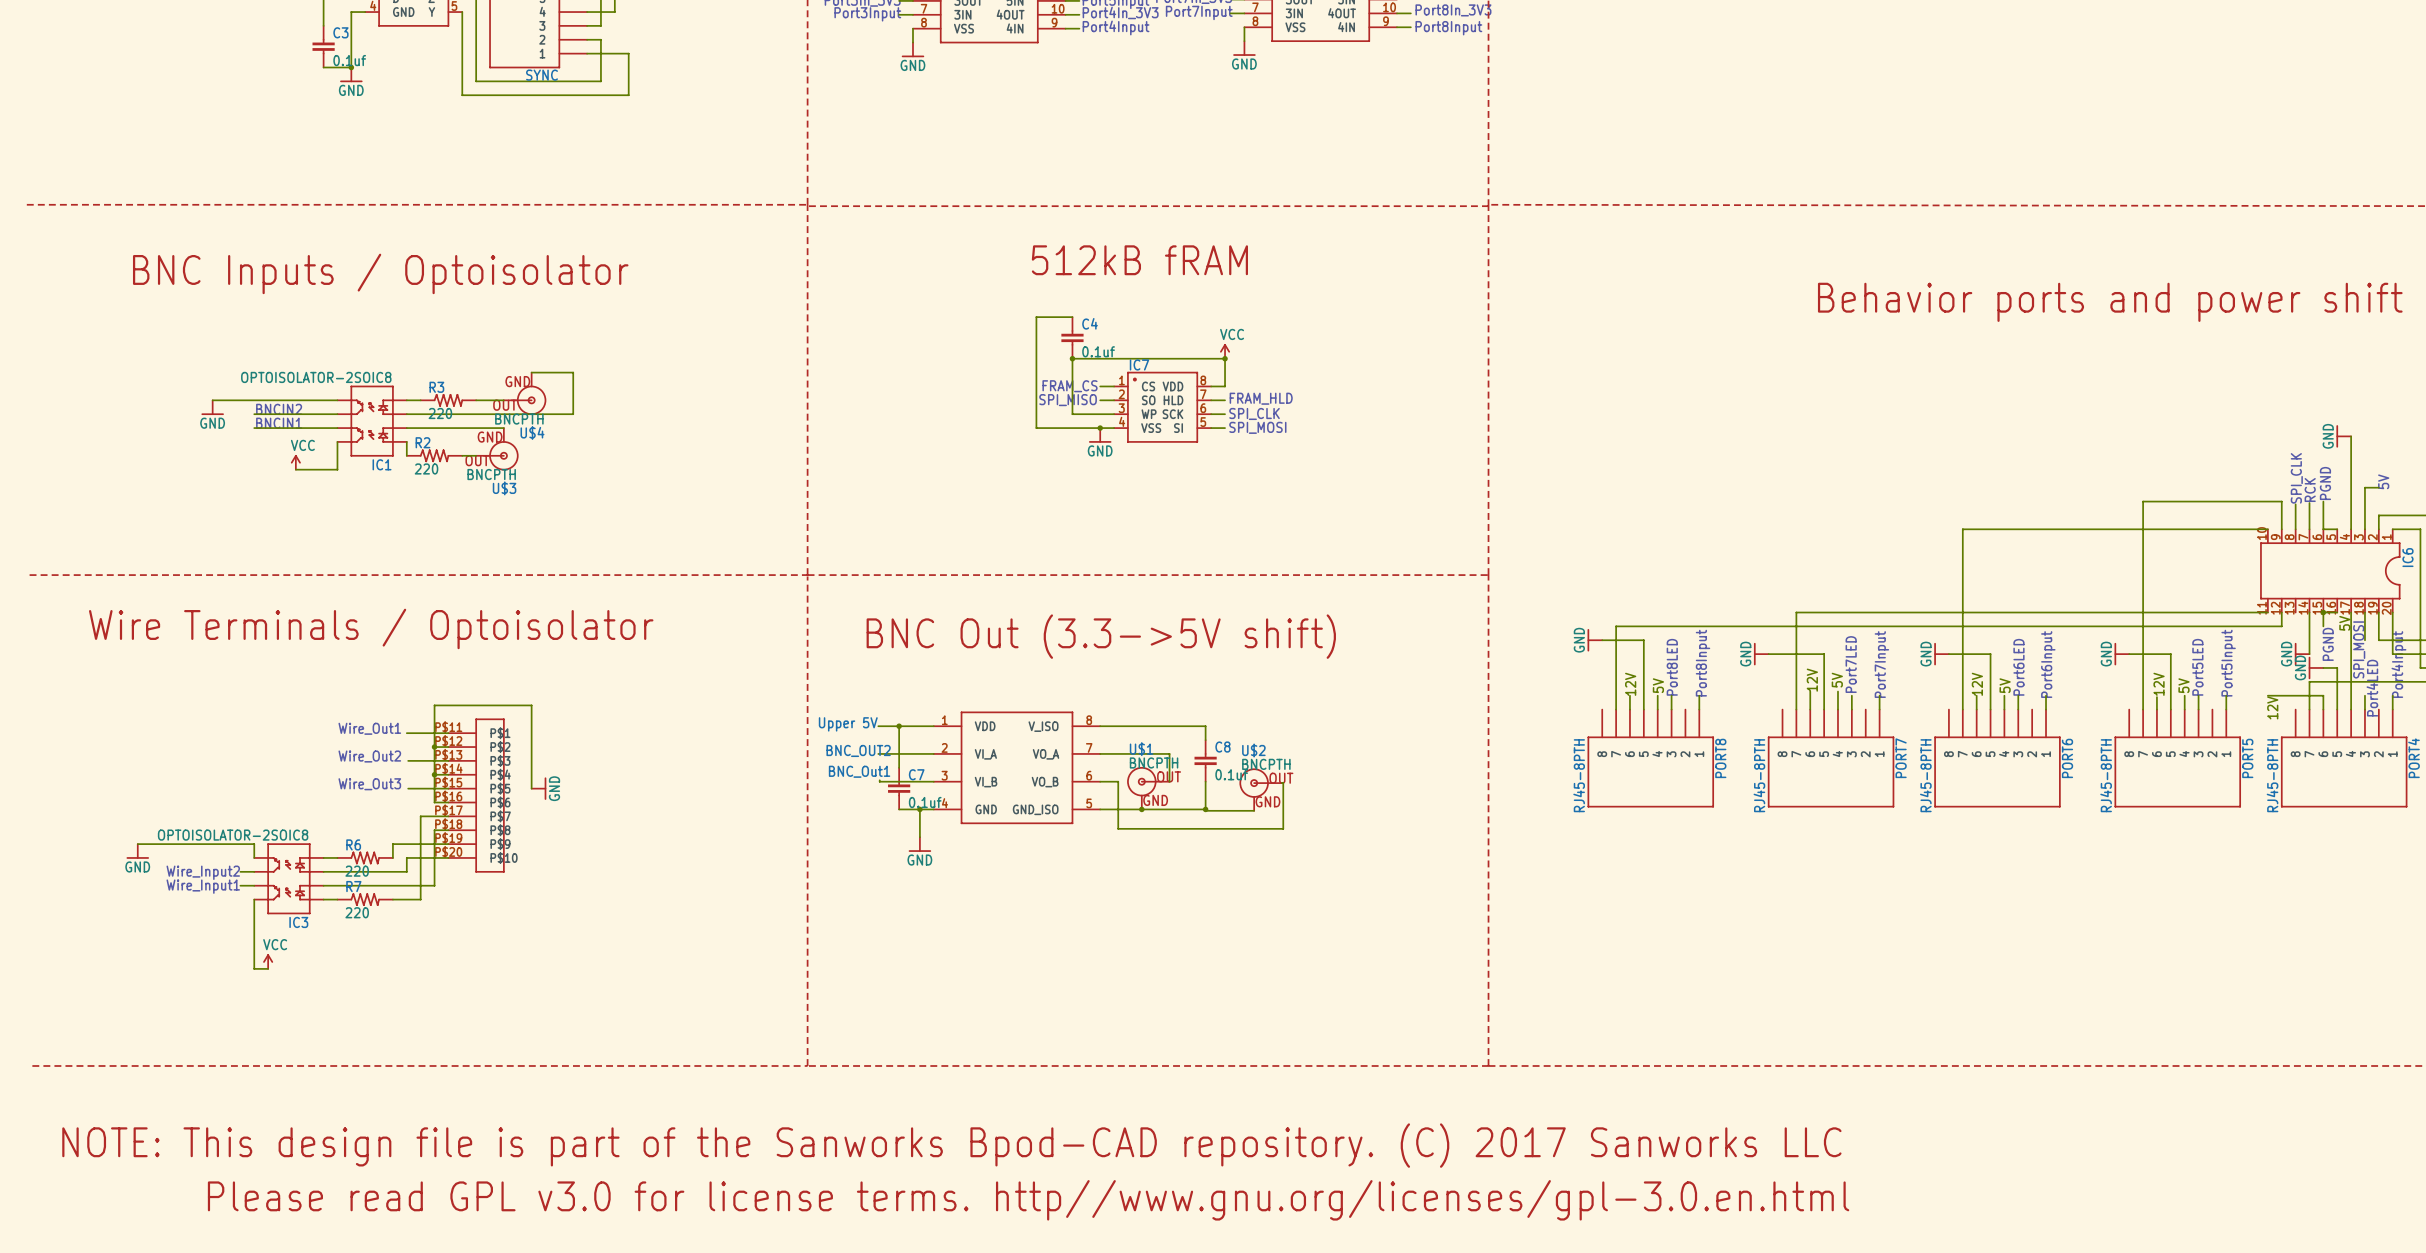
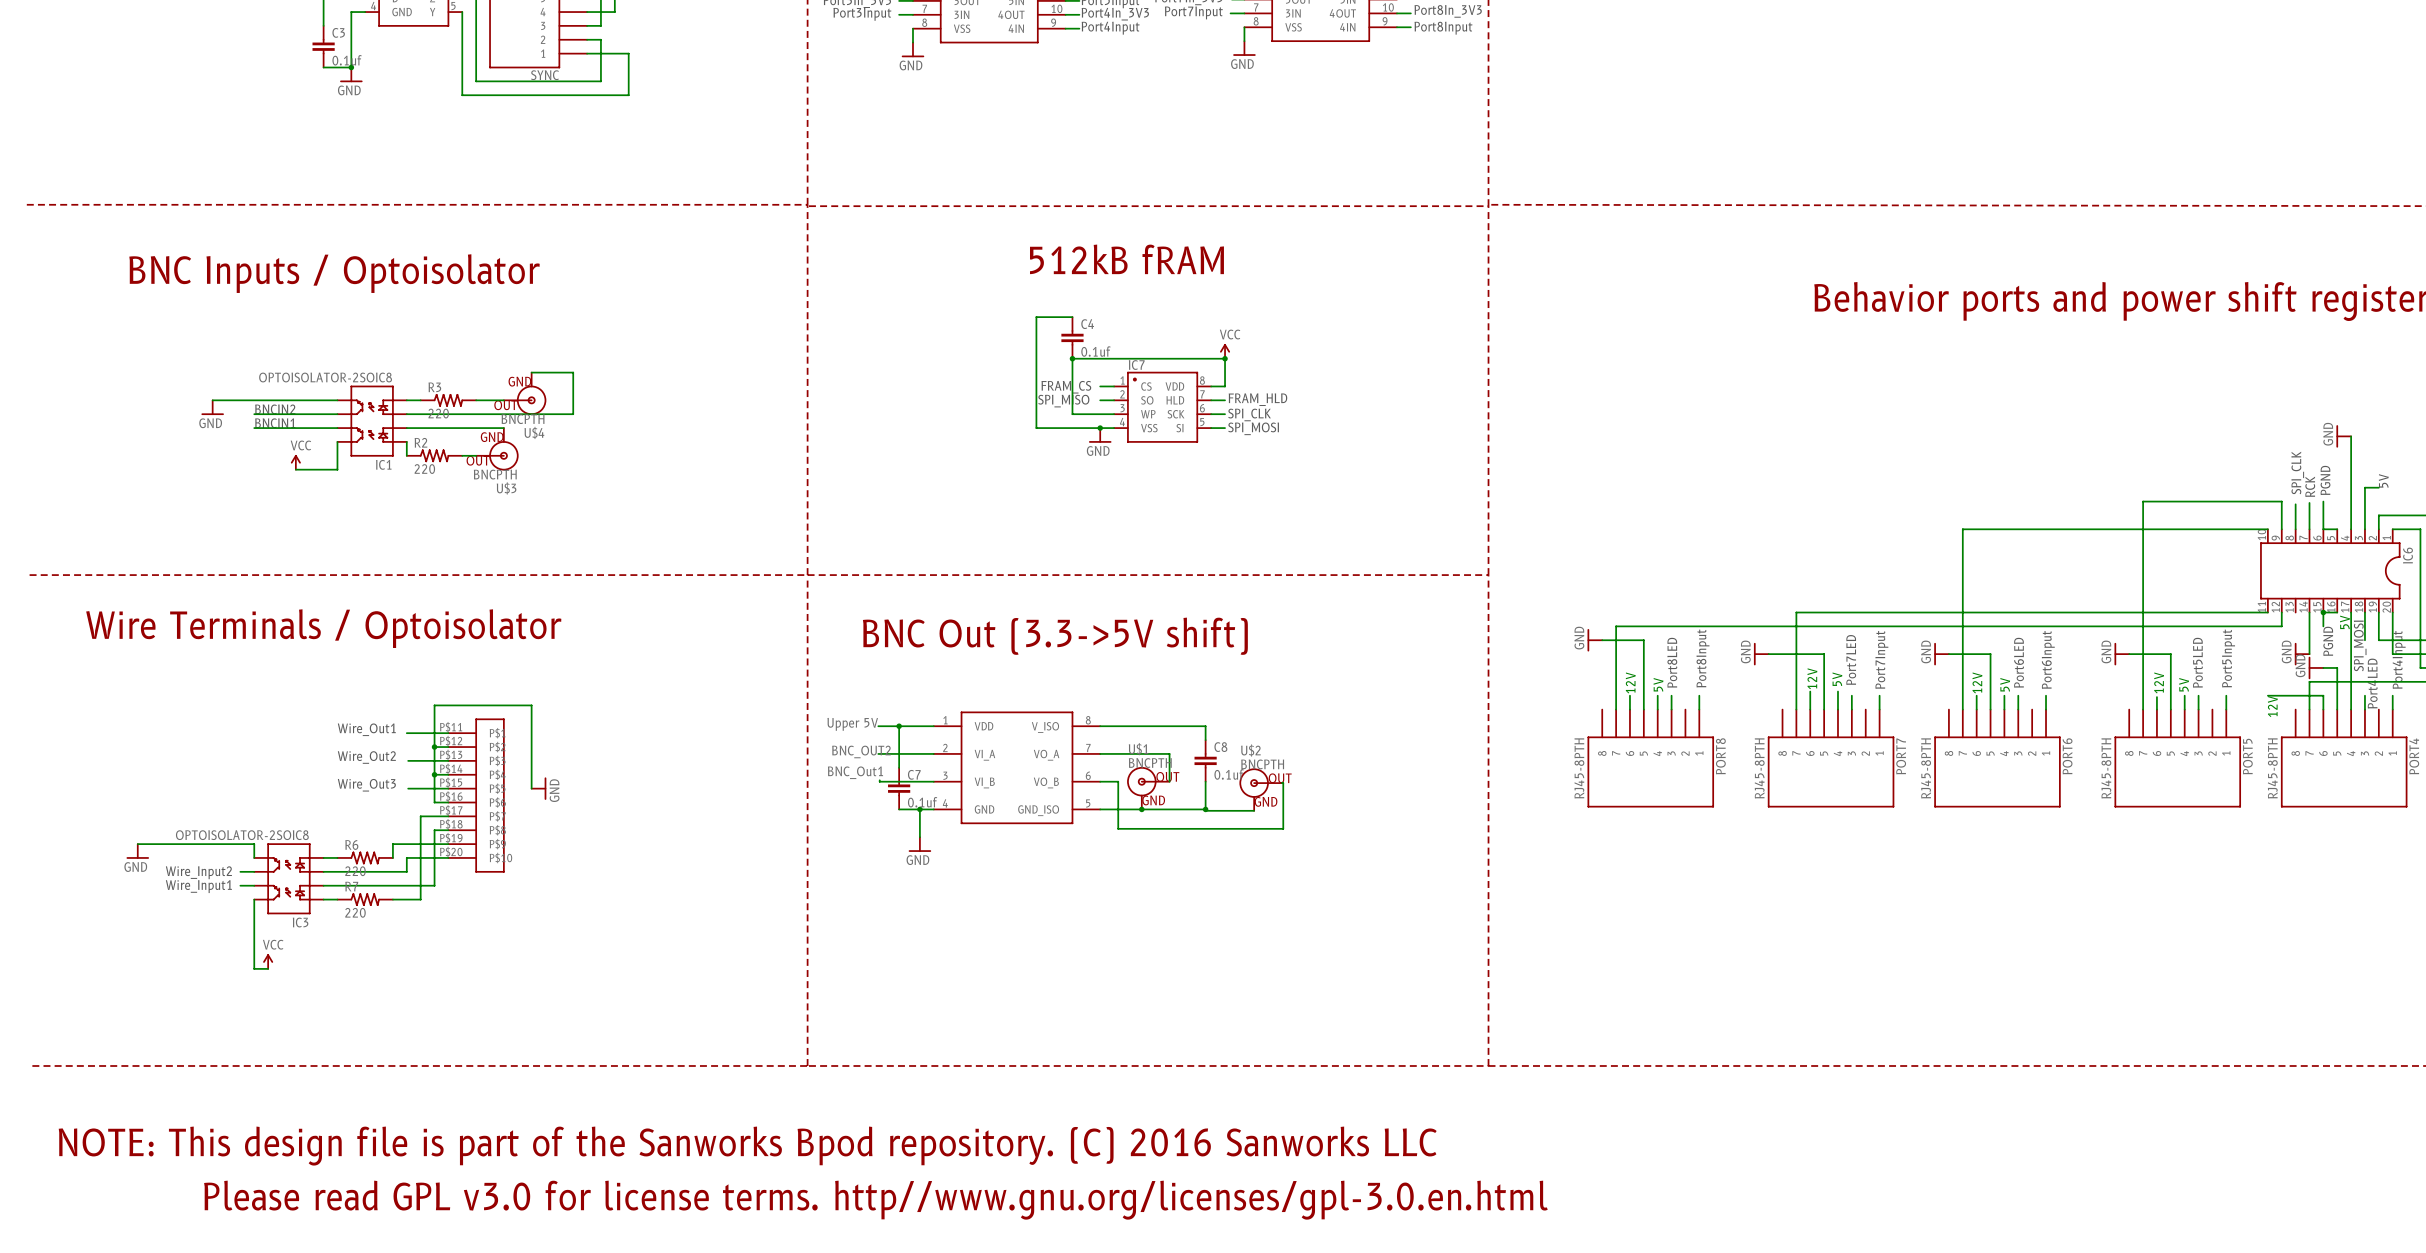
text: NOTE: This design file is part of the Sanworks Bpod-CAD repository. (C) 2017 Sanworks LLC (951, 1145) -> NOTE: This design file is part of the Sanworks Bpod repository. (C) 2016 Sanworks LLC (747, 1146)

